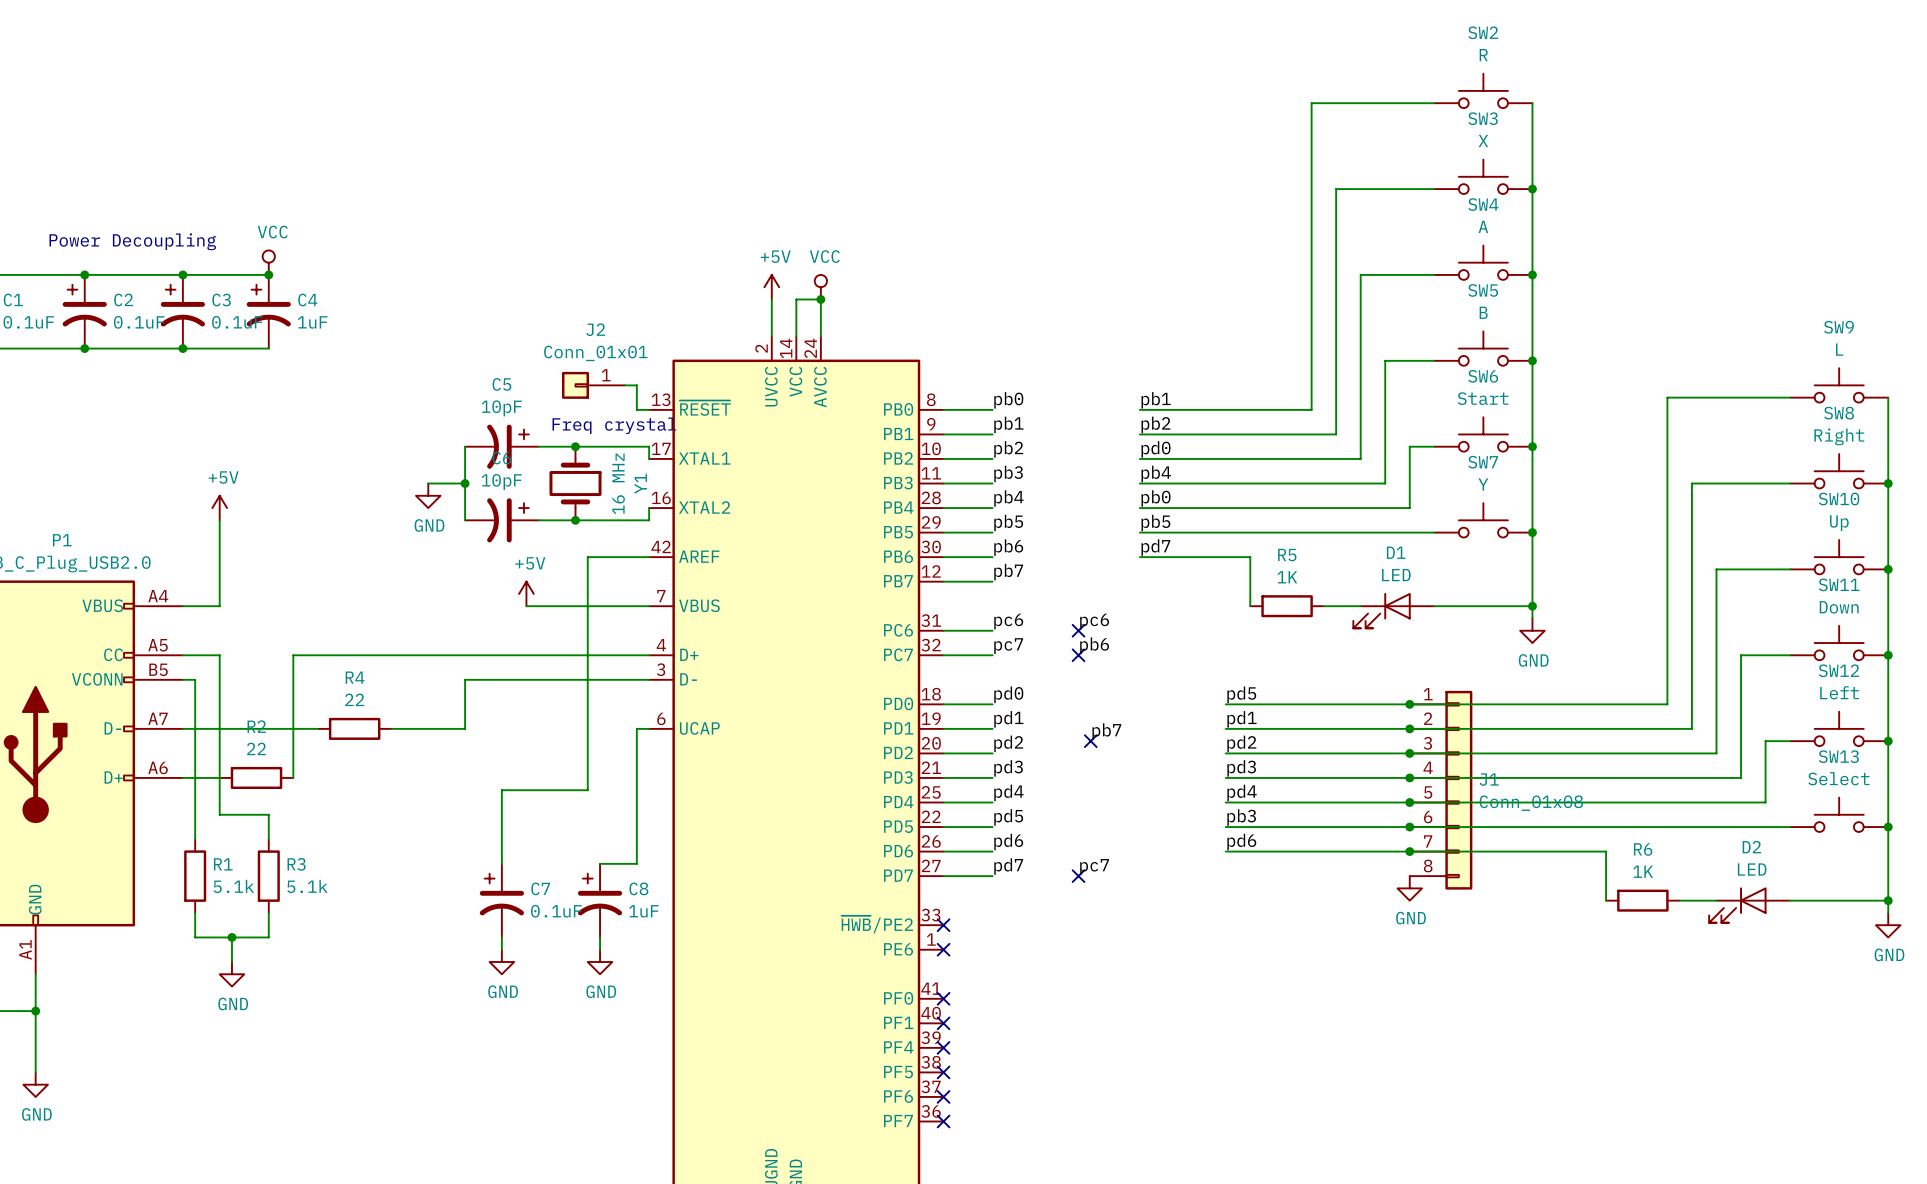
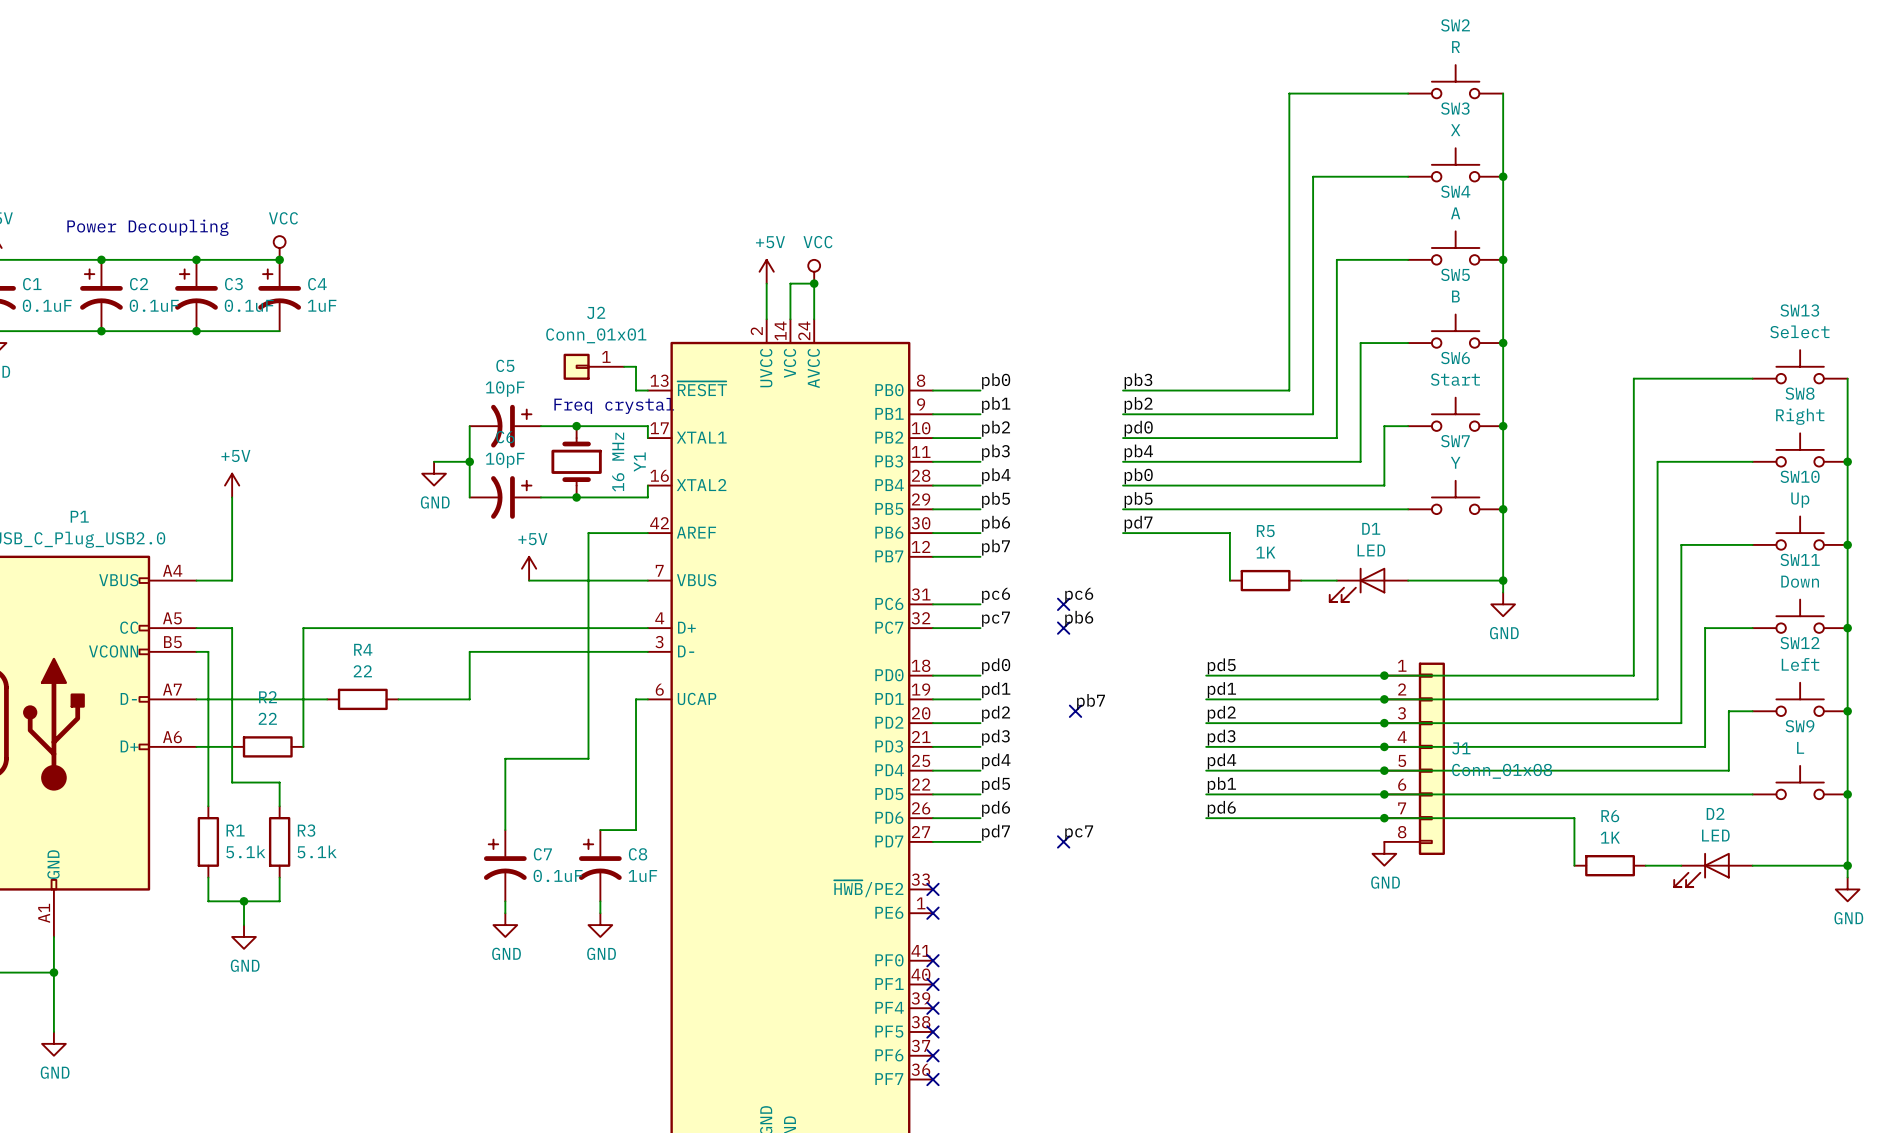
SW9 name: SW9 (1839, 327) -> SW13 (1799, 310)
SW9 value: L (1839, 349) -> Select (1799, 331)
label: pb1 (1156, 400) -> pb3 (1138, 381)
SW13 name: SW13 (1838, 756) -> SW9 (1799, 726)
SW13 value: Select (1838, 778) -> L (1800, 747)
label: pb3 (1241, 817) -> pb1 (1221, 785)

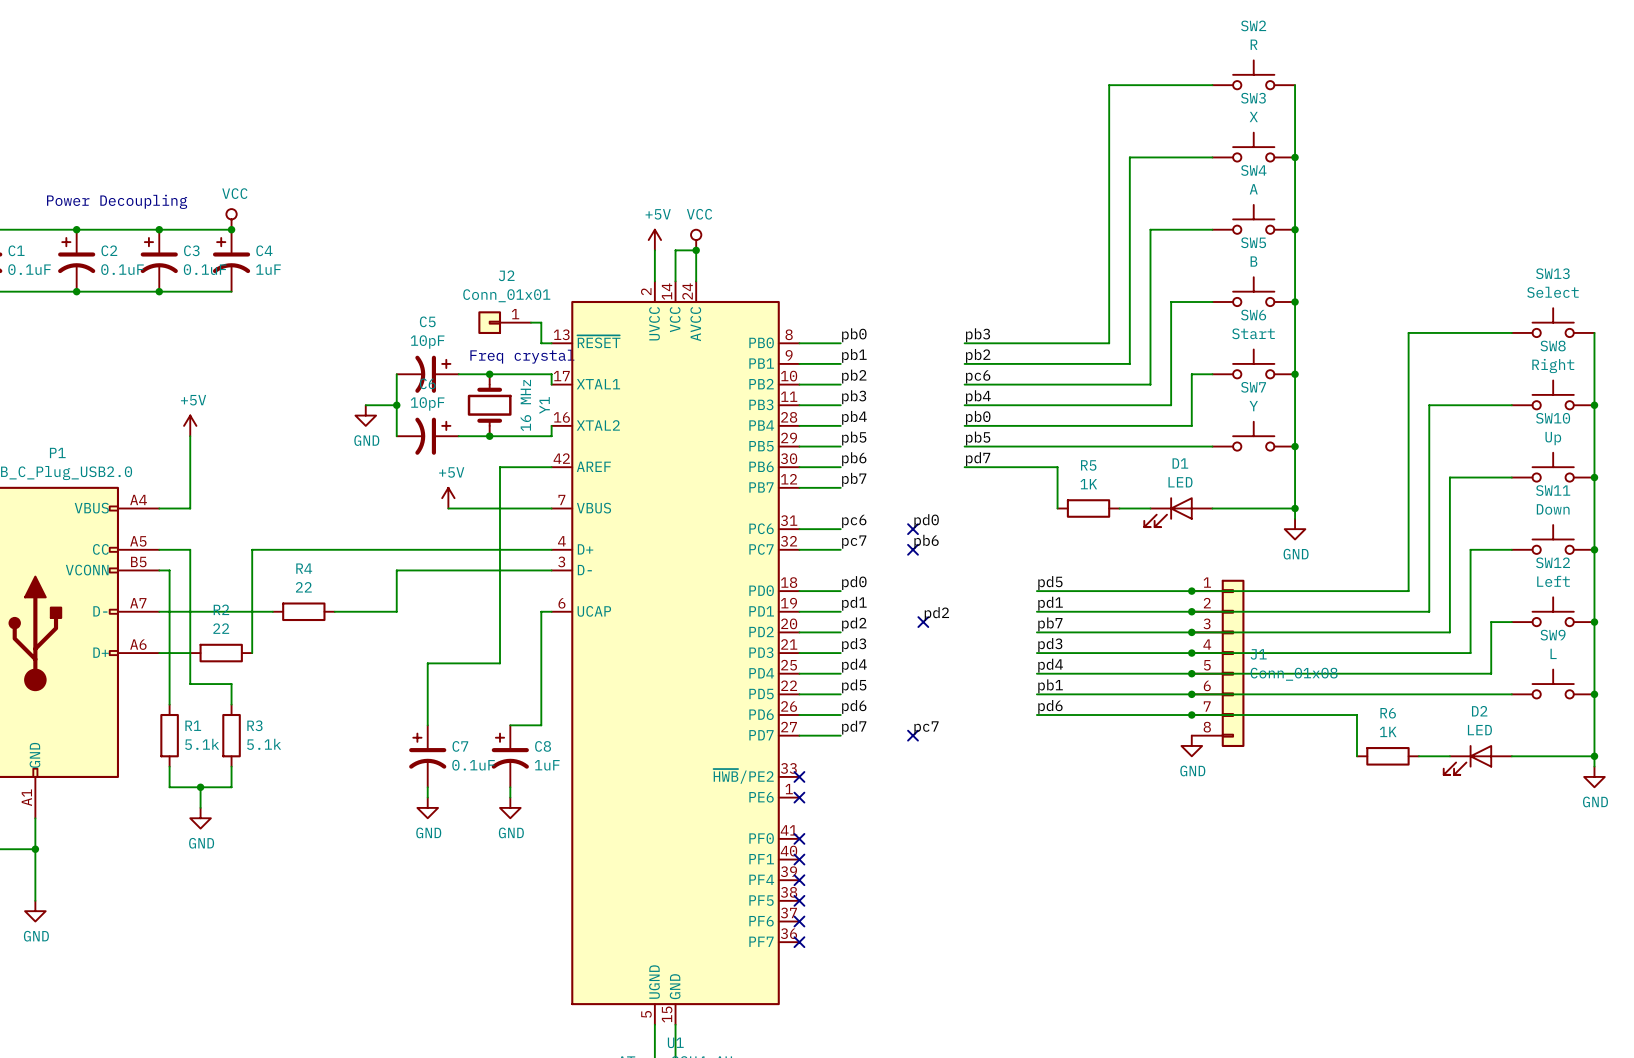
label: pd0 (1138, 428) -> pc6 (978, 376)
label: pc6 (1079, 595) -> pd0 (926, 521)
label: pb7 (1091, 702) -> pd2 (936, 614)
label: pd2 (1221, 713) -> pb7 (1050, 624)

